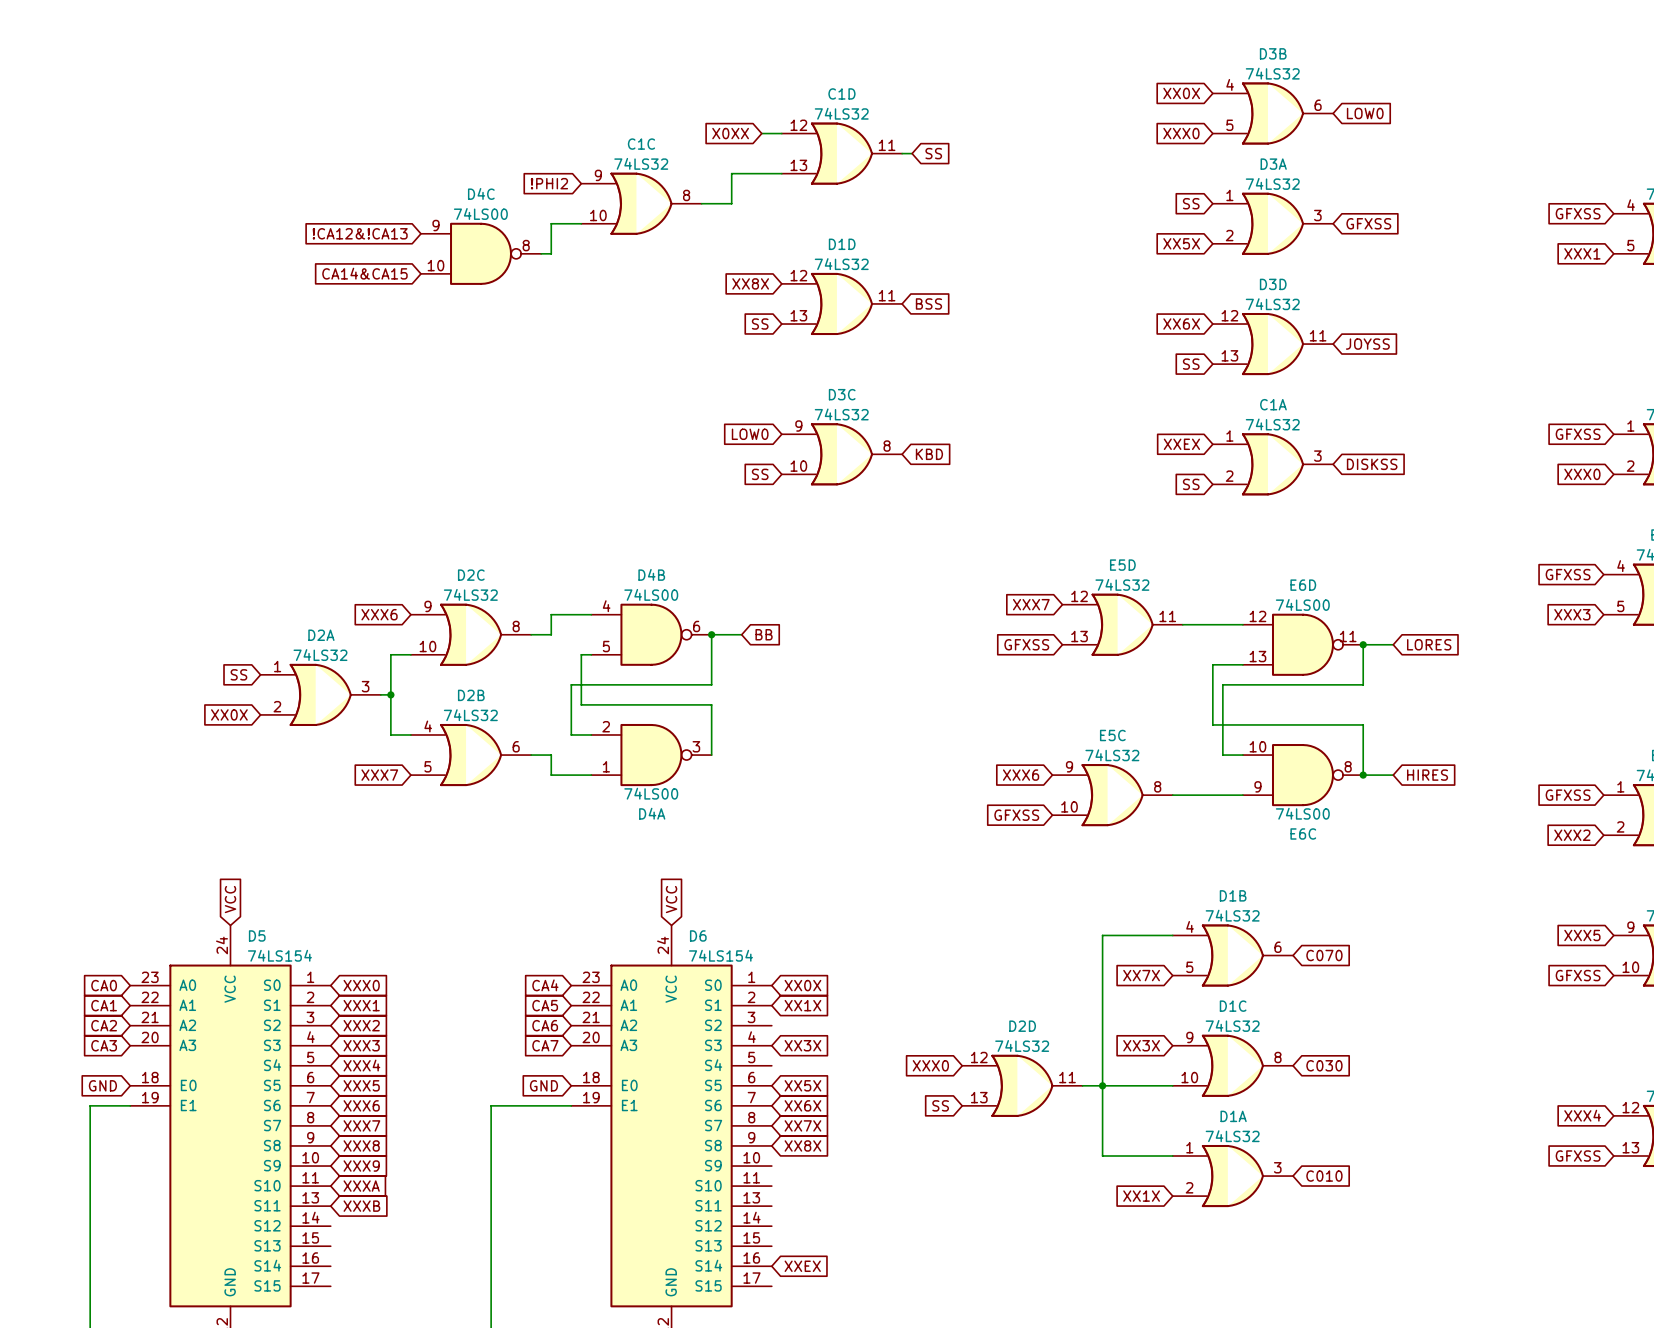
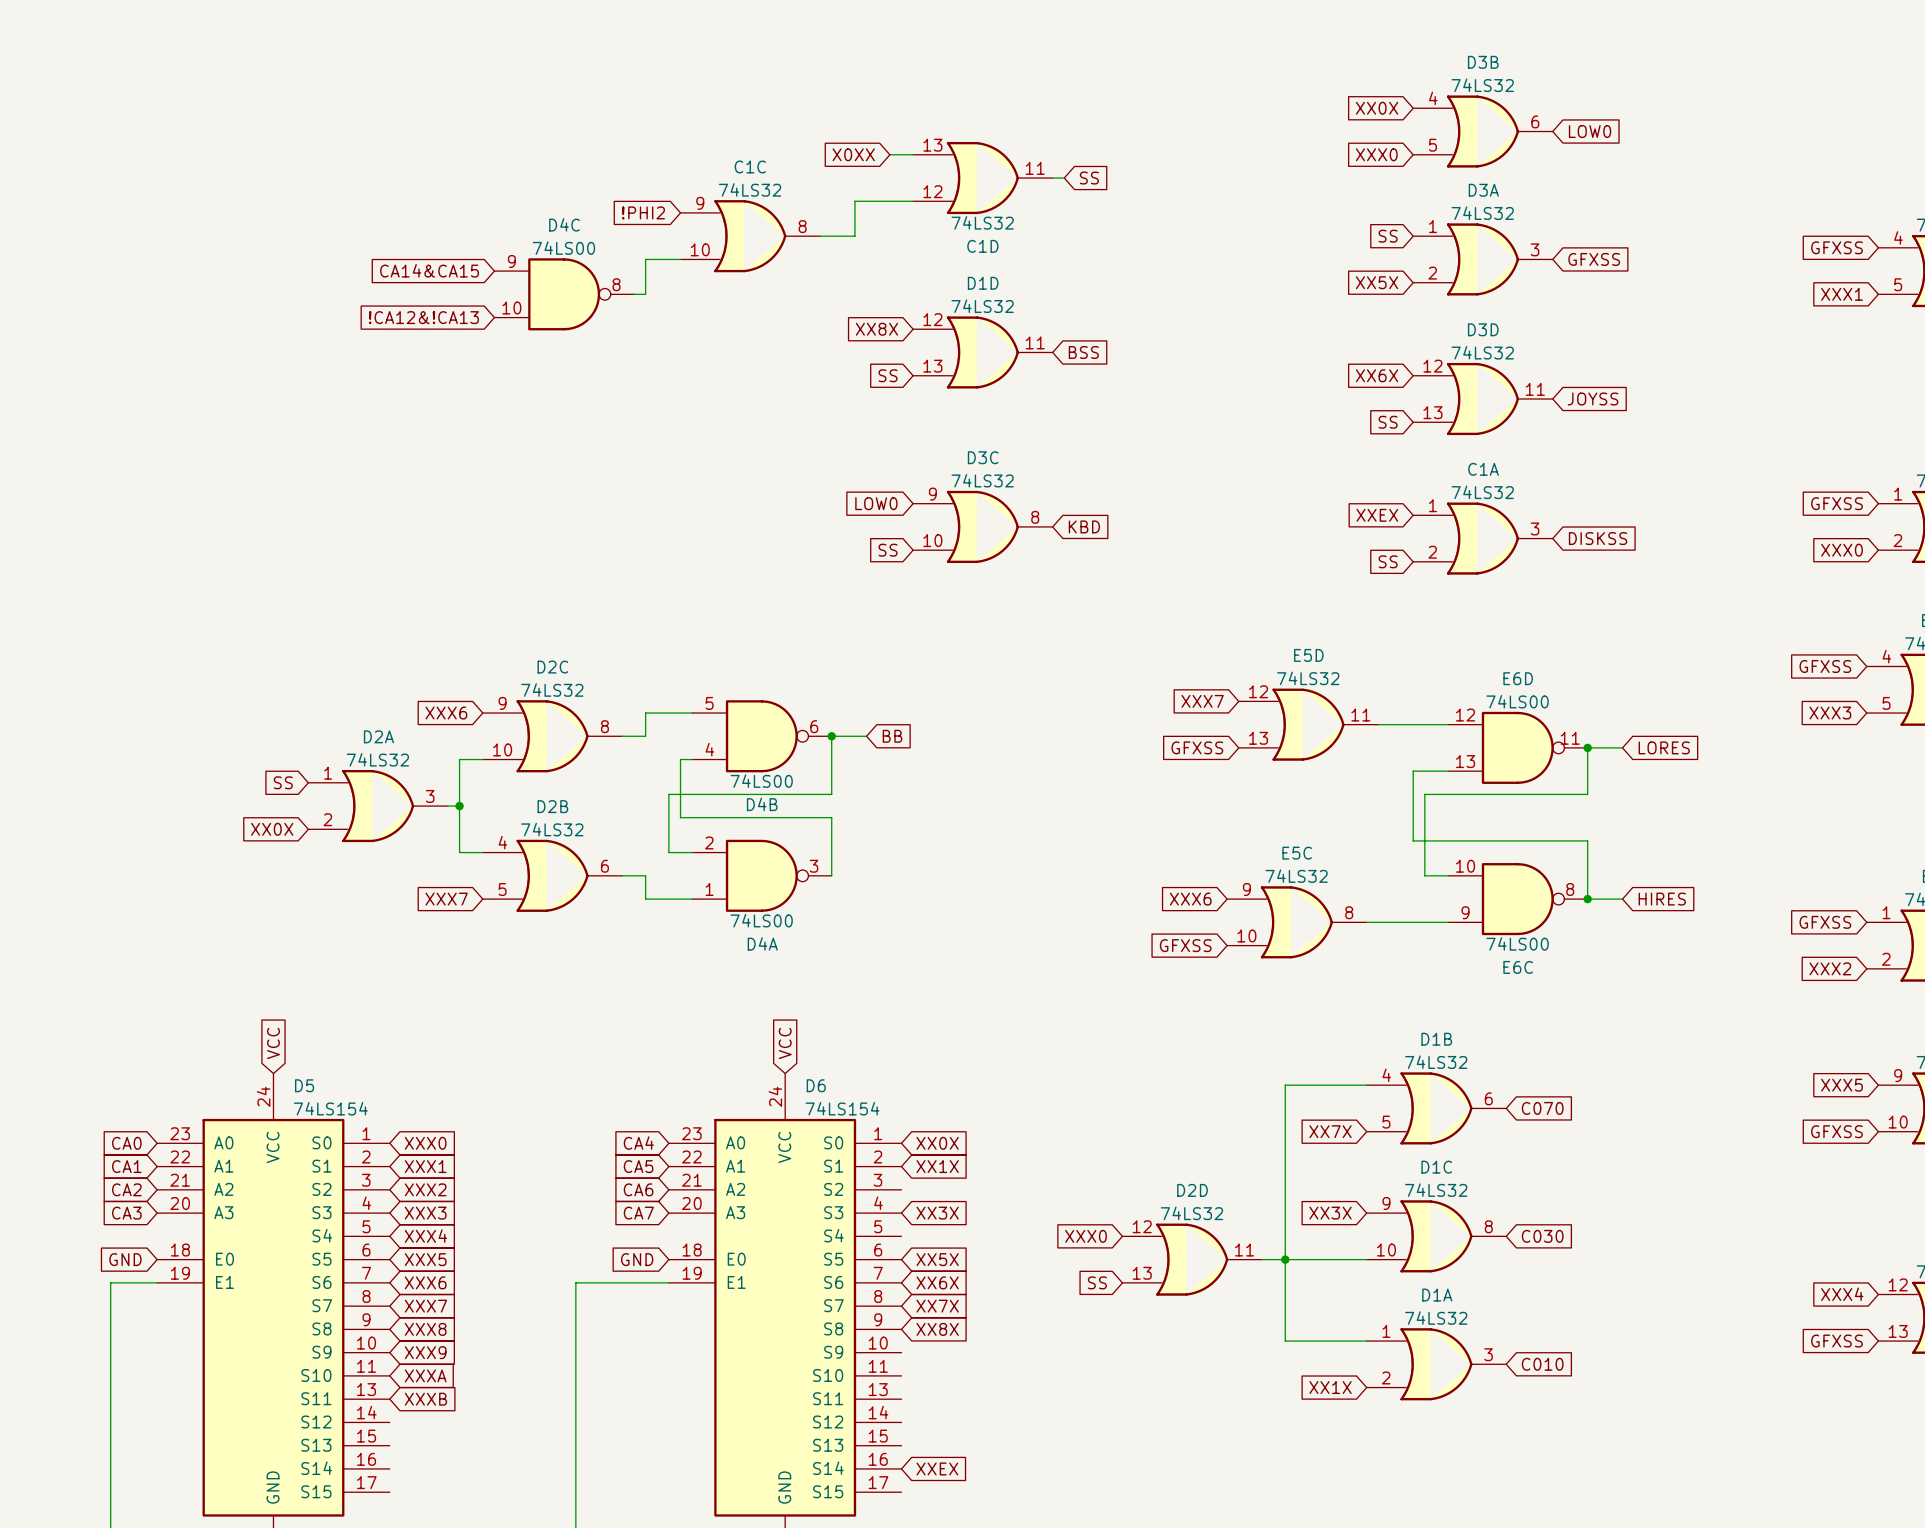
C1D flip: as is (841, 153) -> up-down (982, 178)
global label: !CA12&!CA13 (360, 233) -> CA14&CA15 (429, 270)
global label: CA14&CA15 (364, 273) -> !CA12&!CA13 (423, 317)
D4B flip: as is (651, 634) -> up-down (761, 736)

